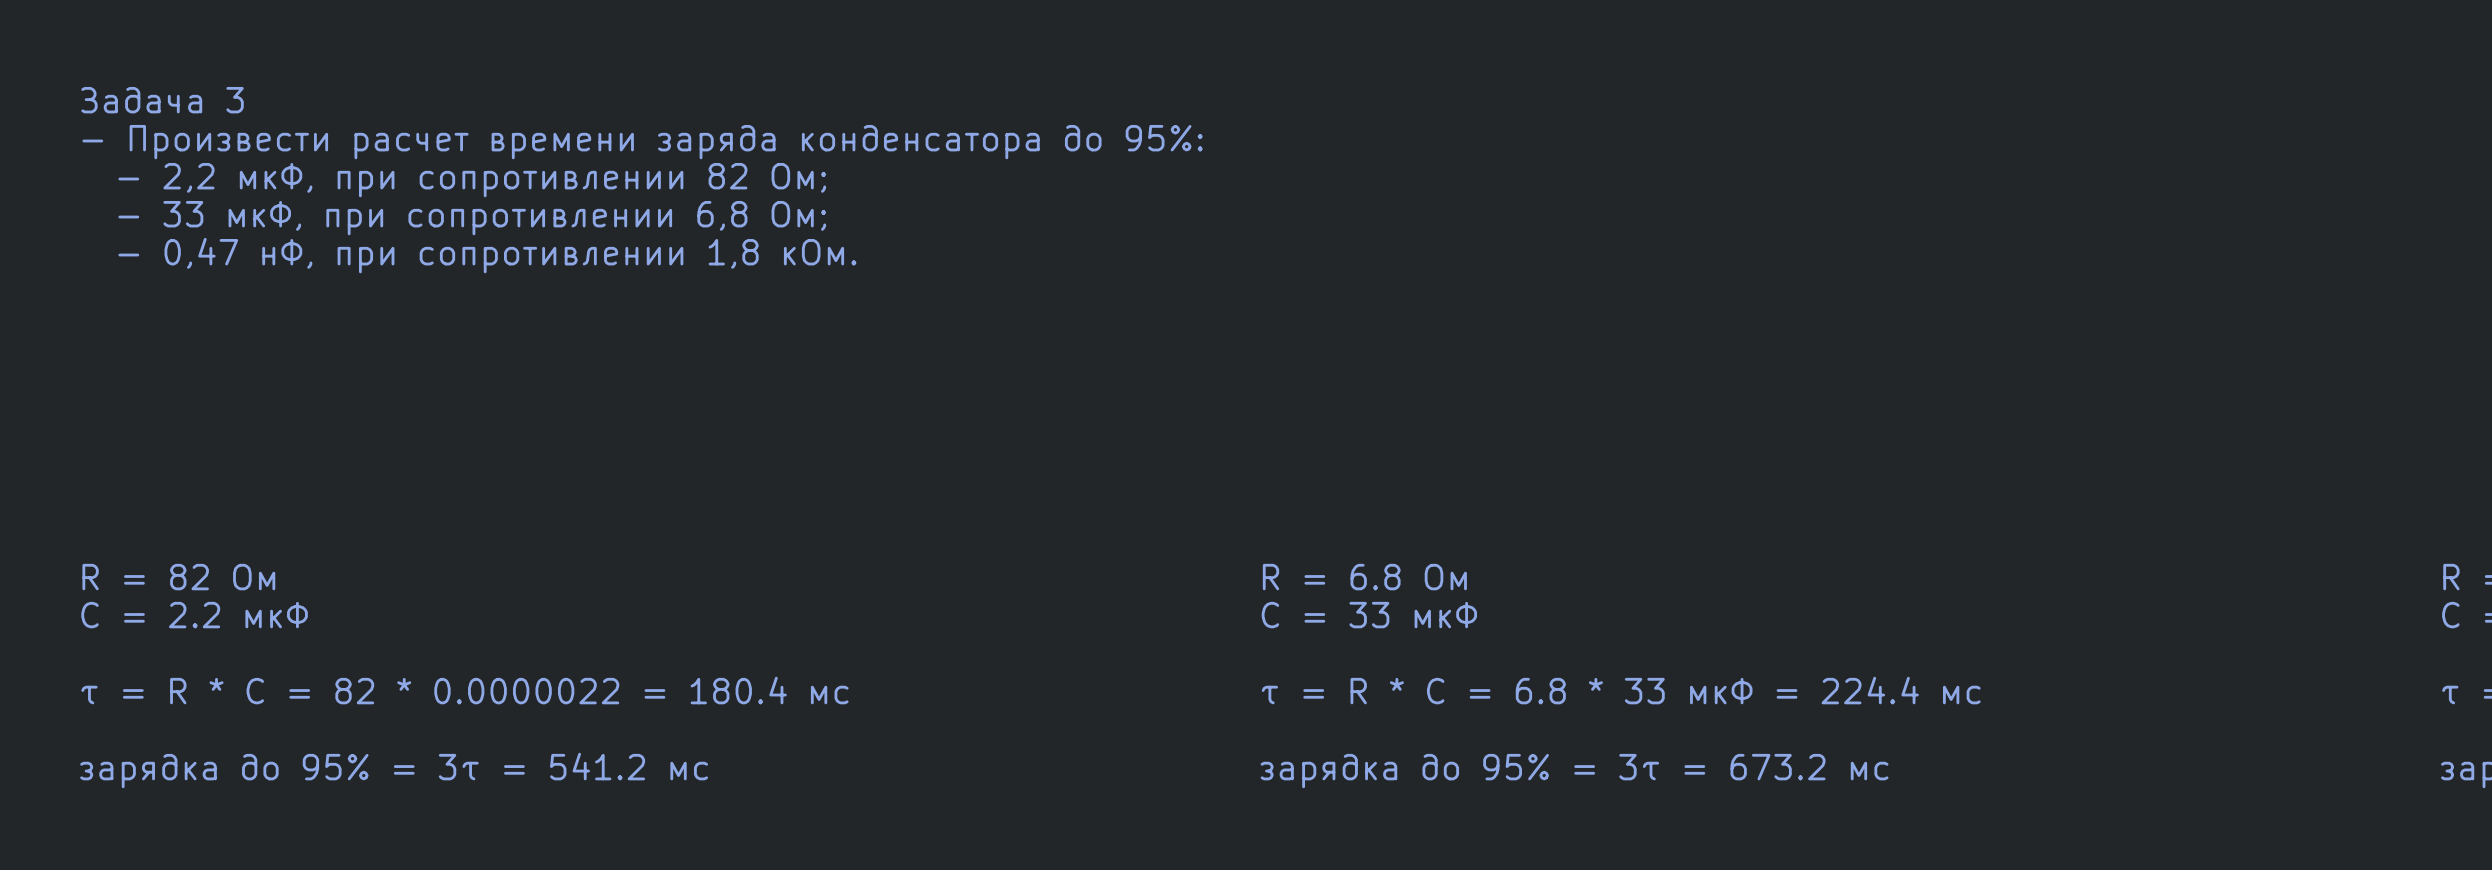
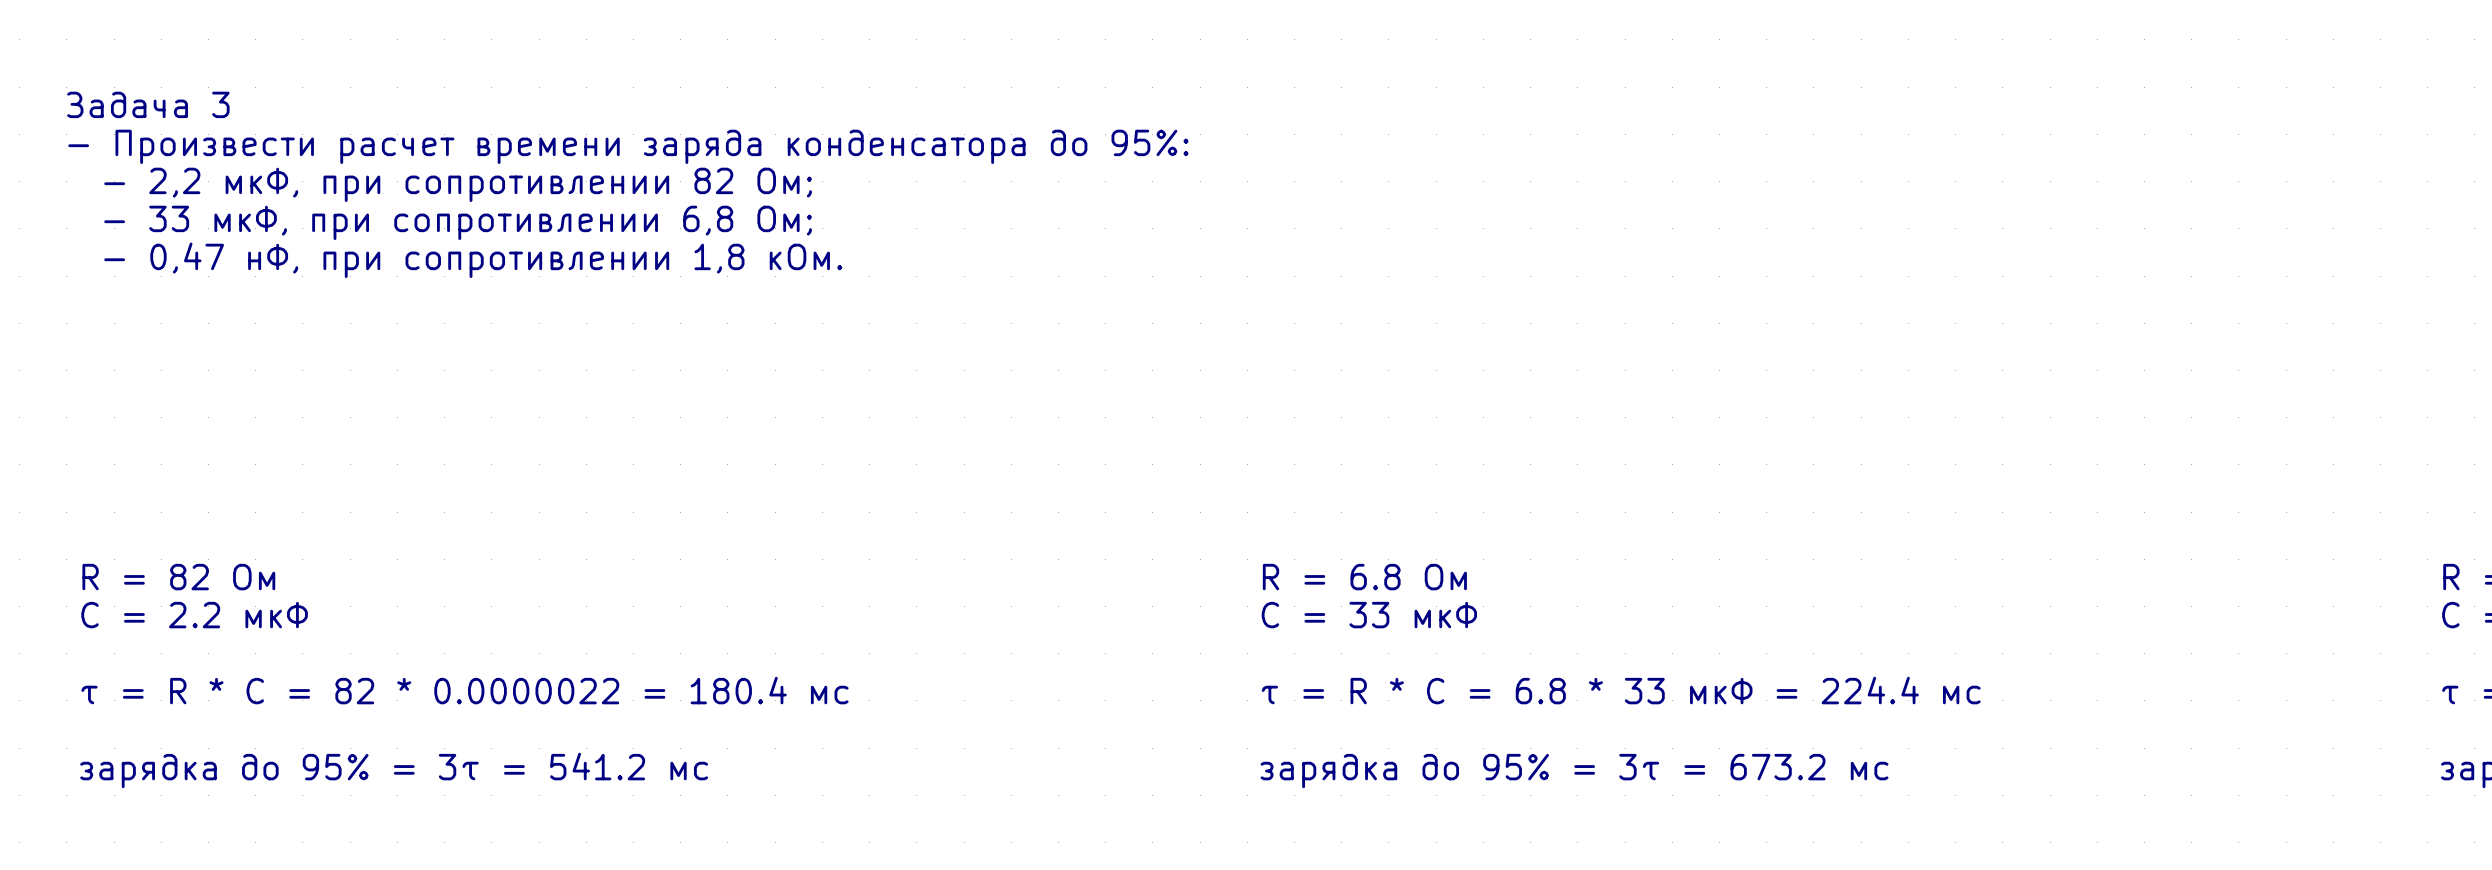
text position: Задача 3 (162, 100) -> Задача 3 (148, 104)
text position: - Произвести расчет времени заряда конденсатора до 95%: (642, 142) -> - Произвести расчет времени заряда конденсатора до 95%: (628, 146)
text position: - 2,2 мкФ, при сопротивлении 82 Ом; (472, 180) -> - 2,2 мкФ, при сопротивлении 82 Ом; (458, 184)
text position: - 33 мкФ, при сопротивлении 6,8 Ом; (472, 218) -> - 33 мкФ, при сопротивлении 6,8 Ом; (458, 222)
text position: - 0,47 нФ, при сопротивлении 1,8 кОм. (487, 255) -> - 0,47 нФ, при сопротивлении 1,8 кОм. (473, 260)

